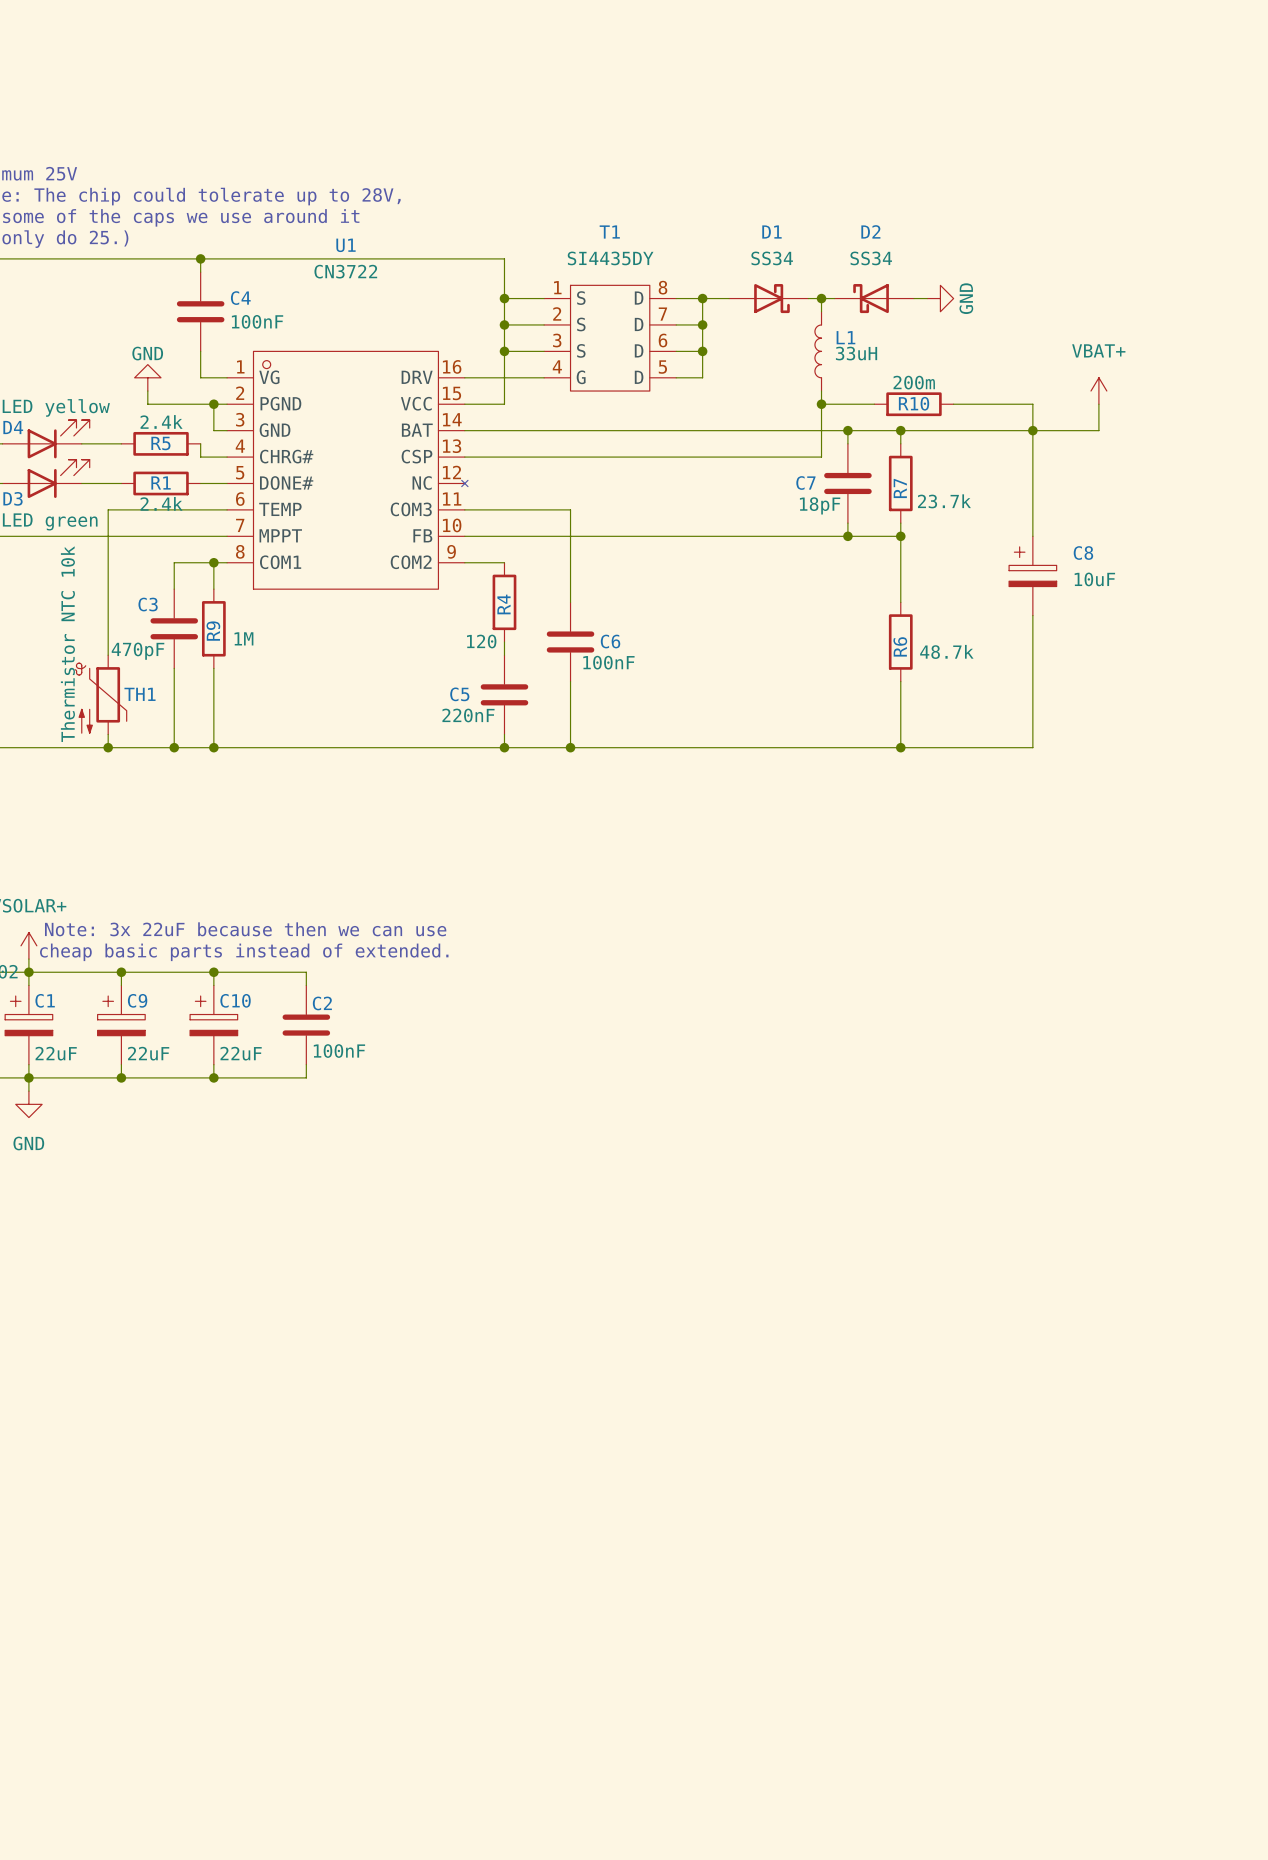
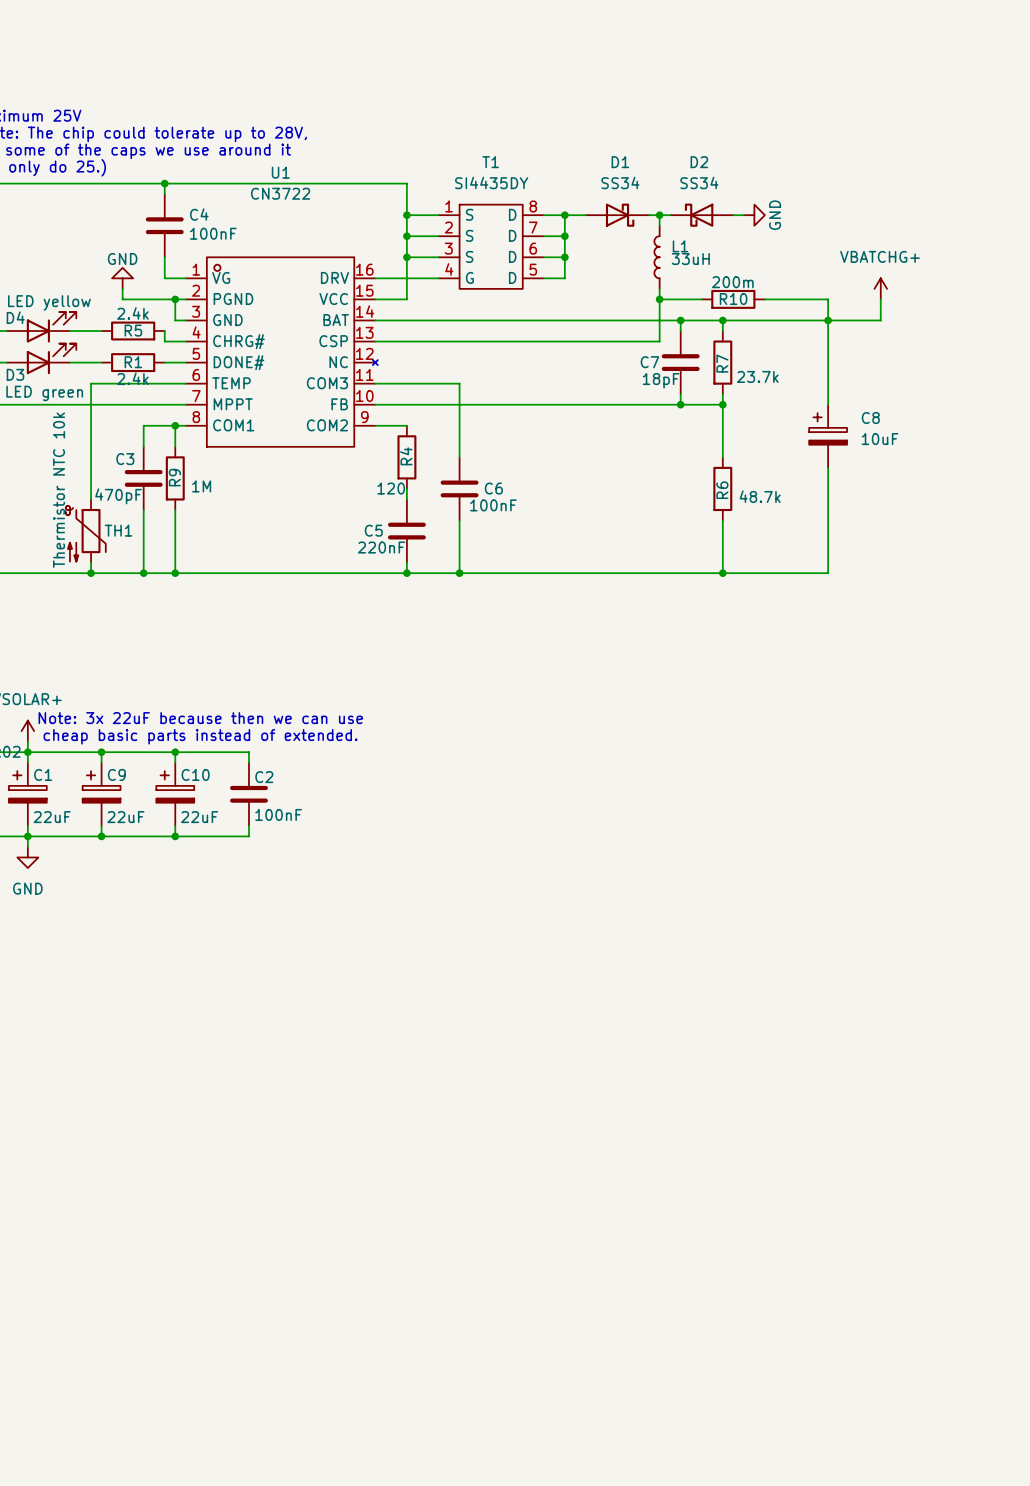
power symbol: VBAT+ (1098, 391) -> VBATCHG+ (880, 288)

